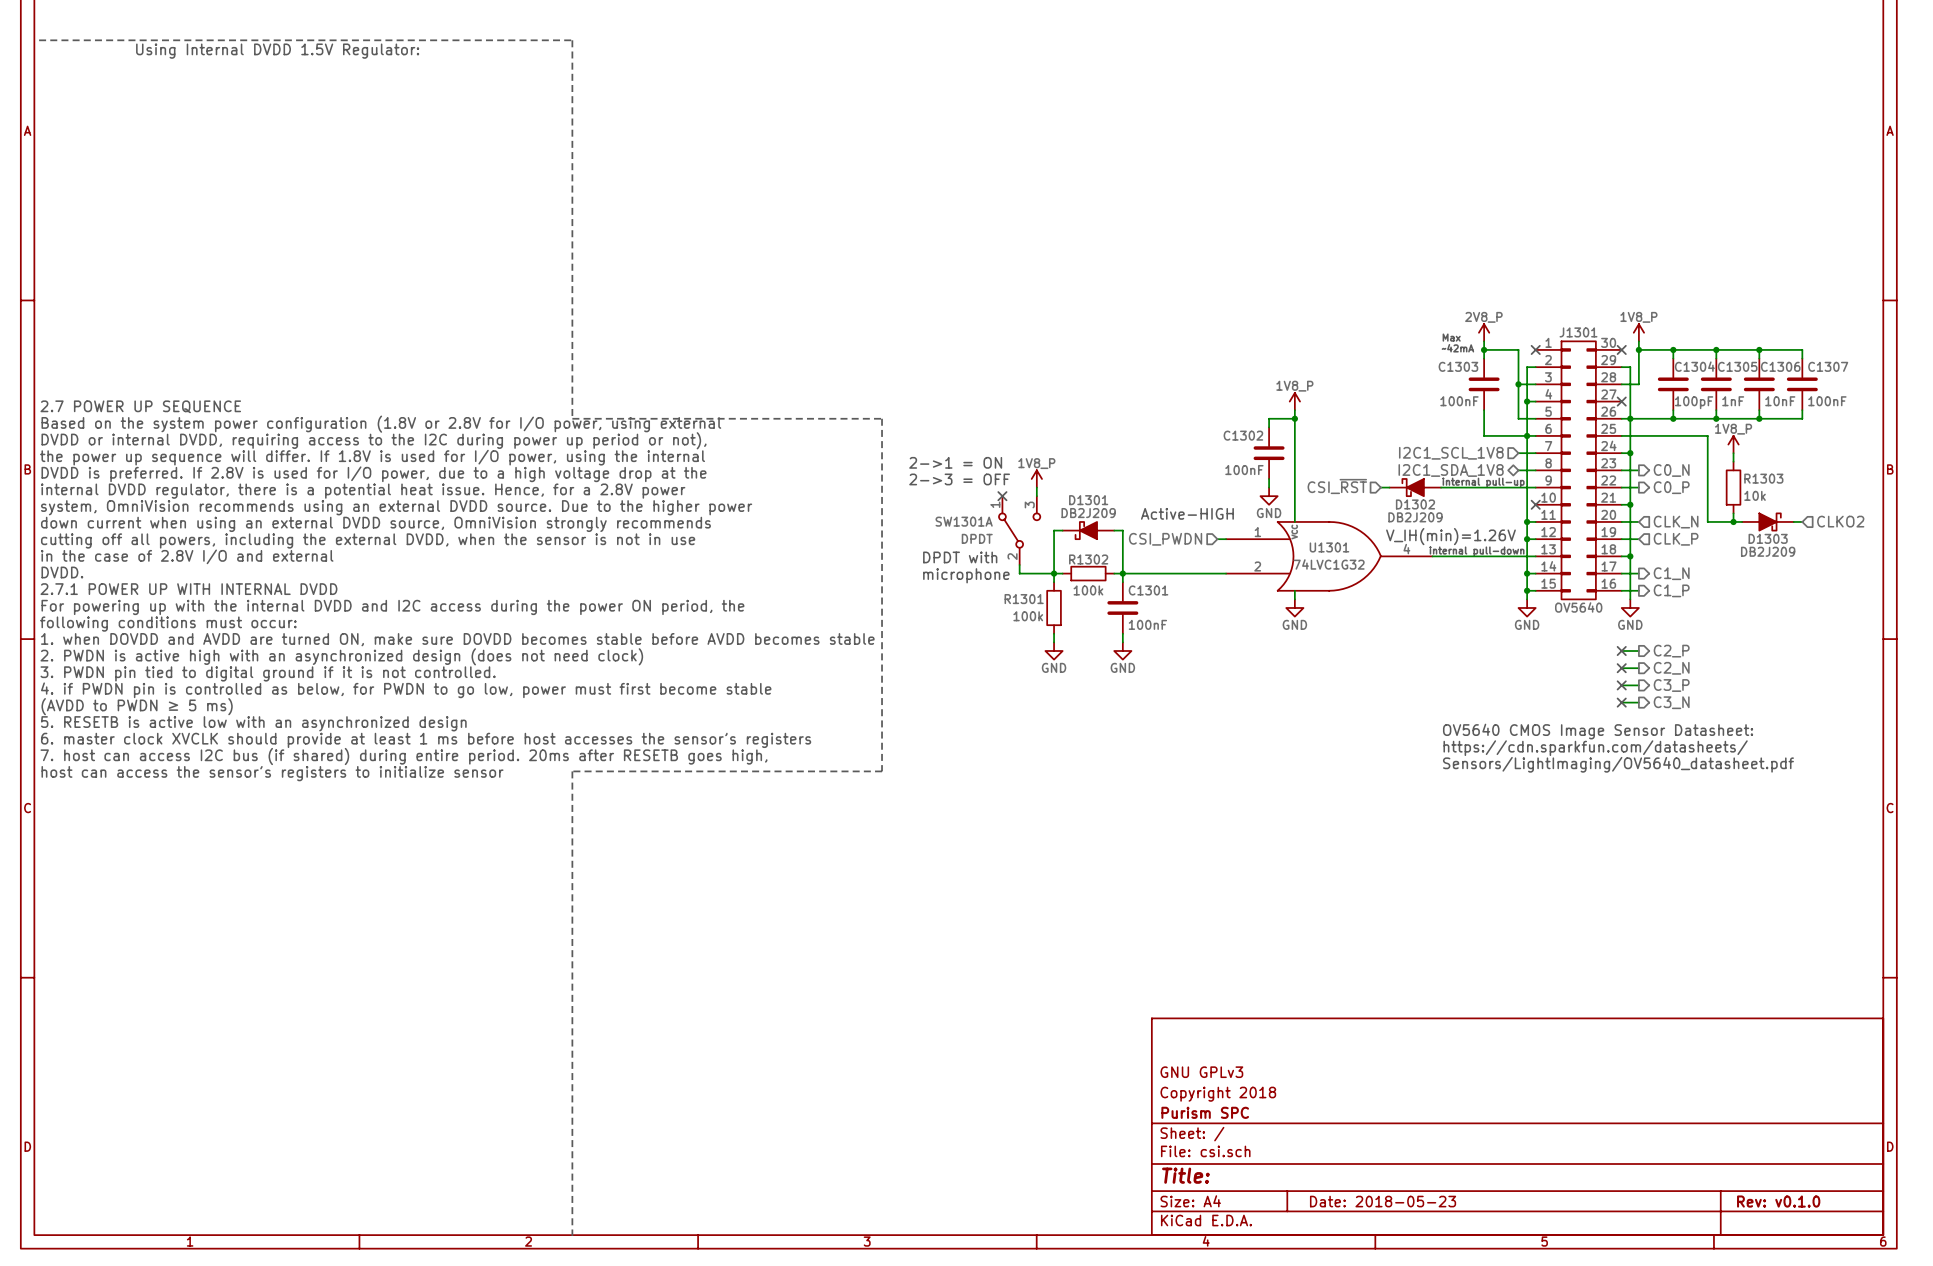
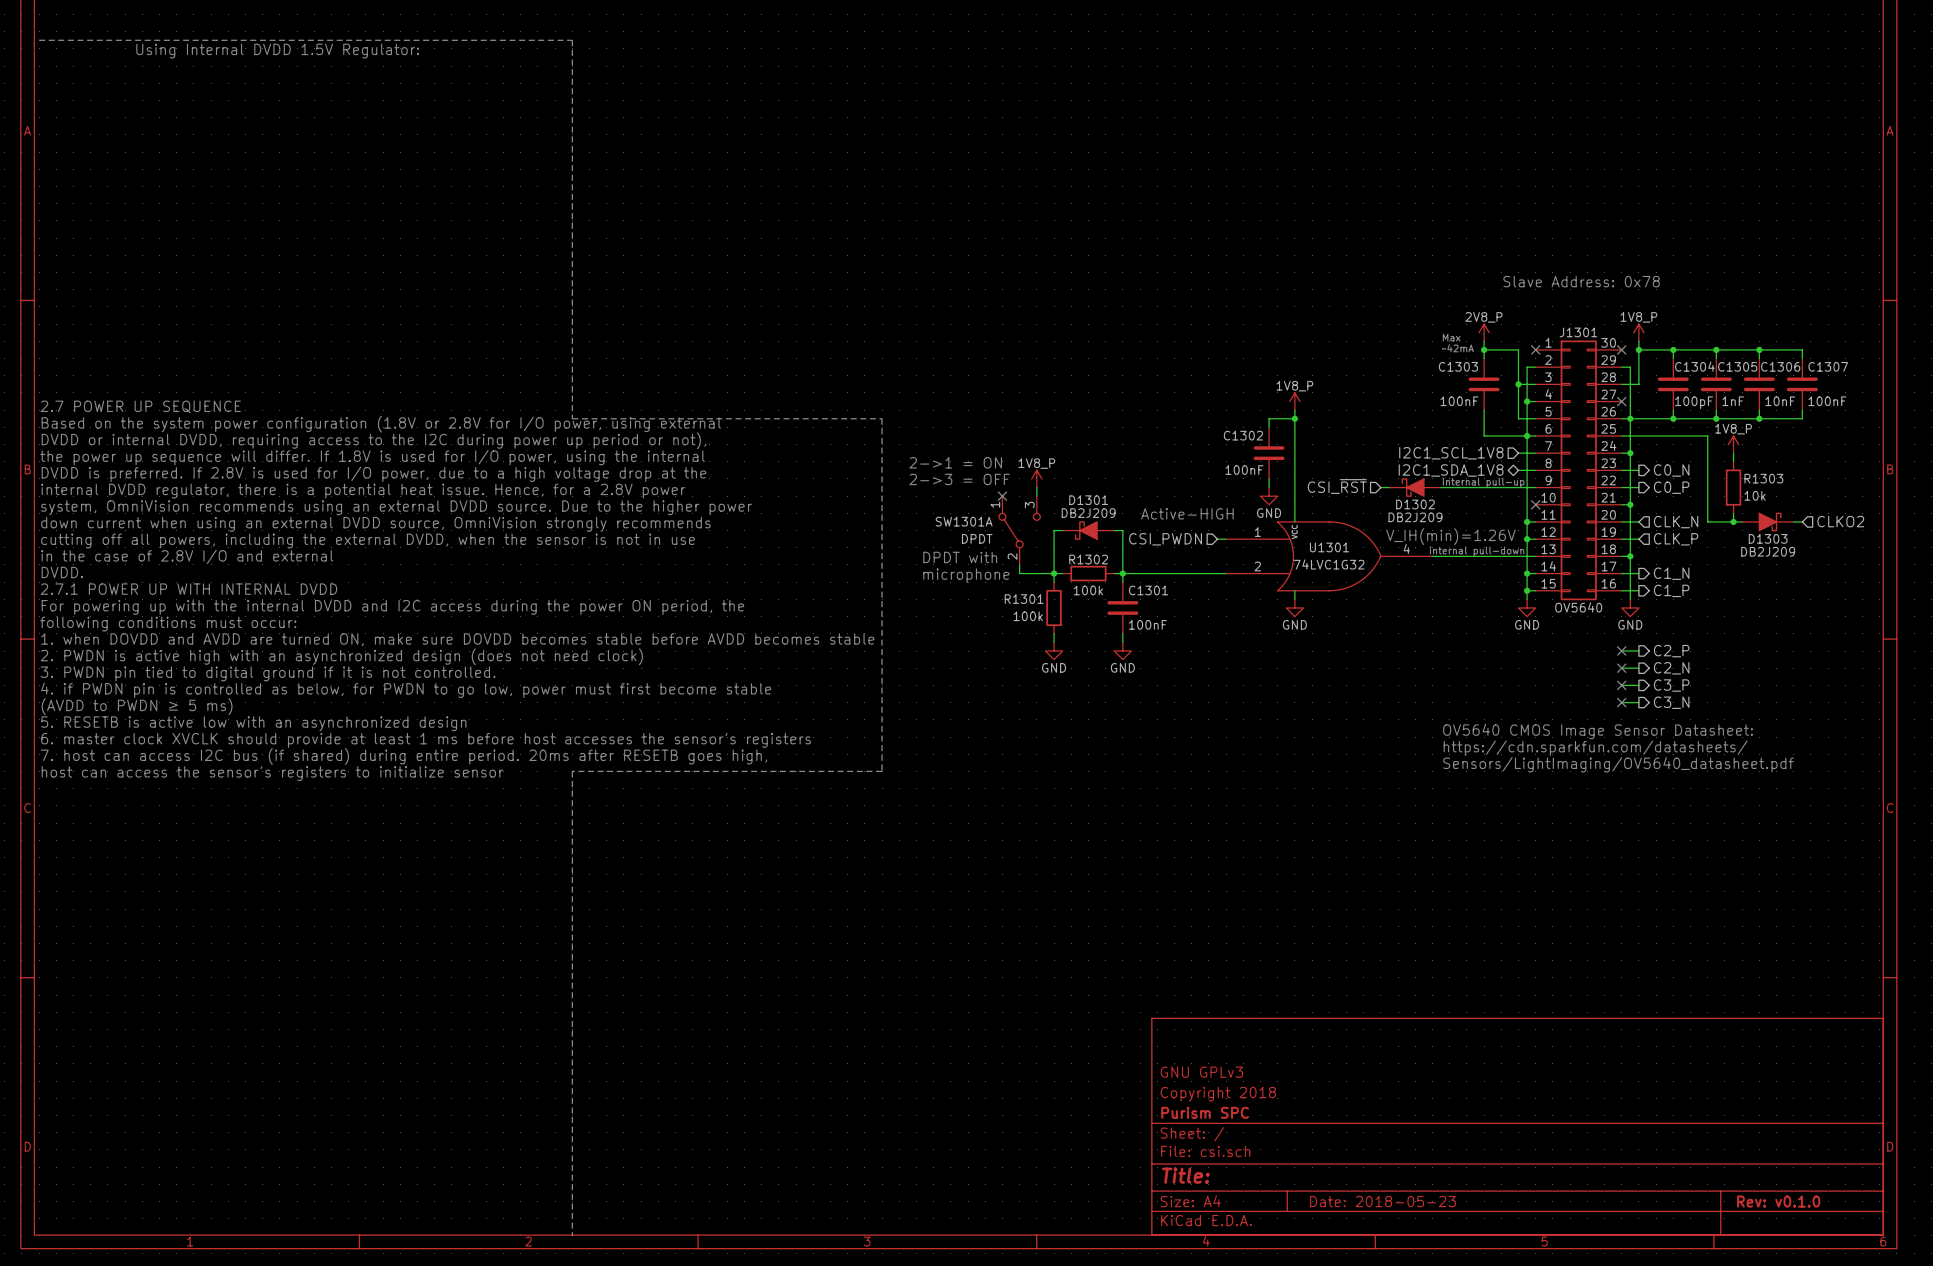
text: none -> Slave Address: 0x78 (1581, 281)

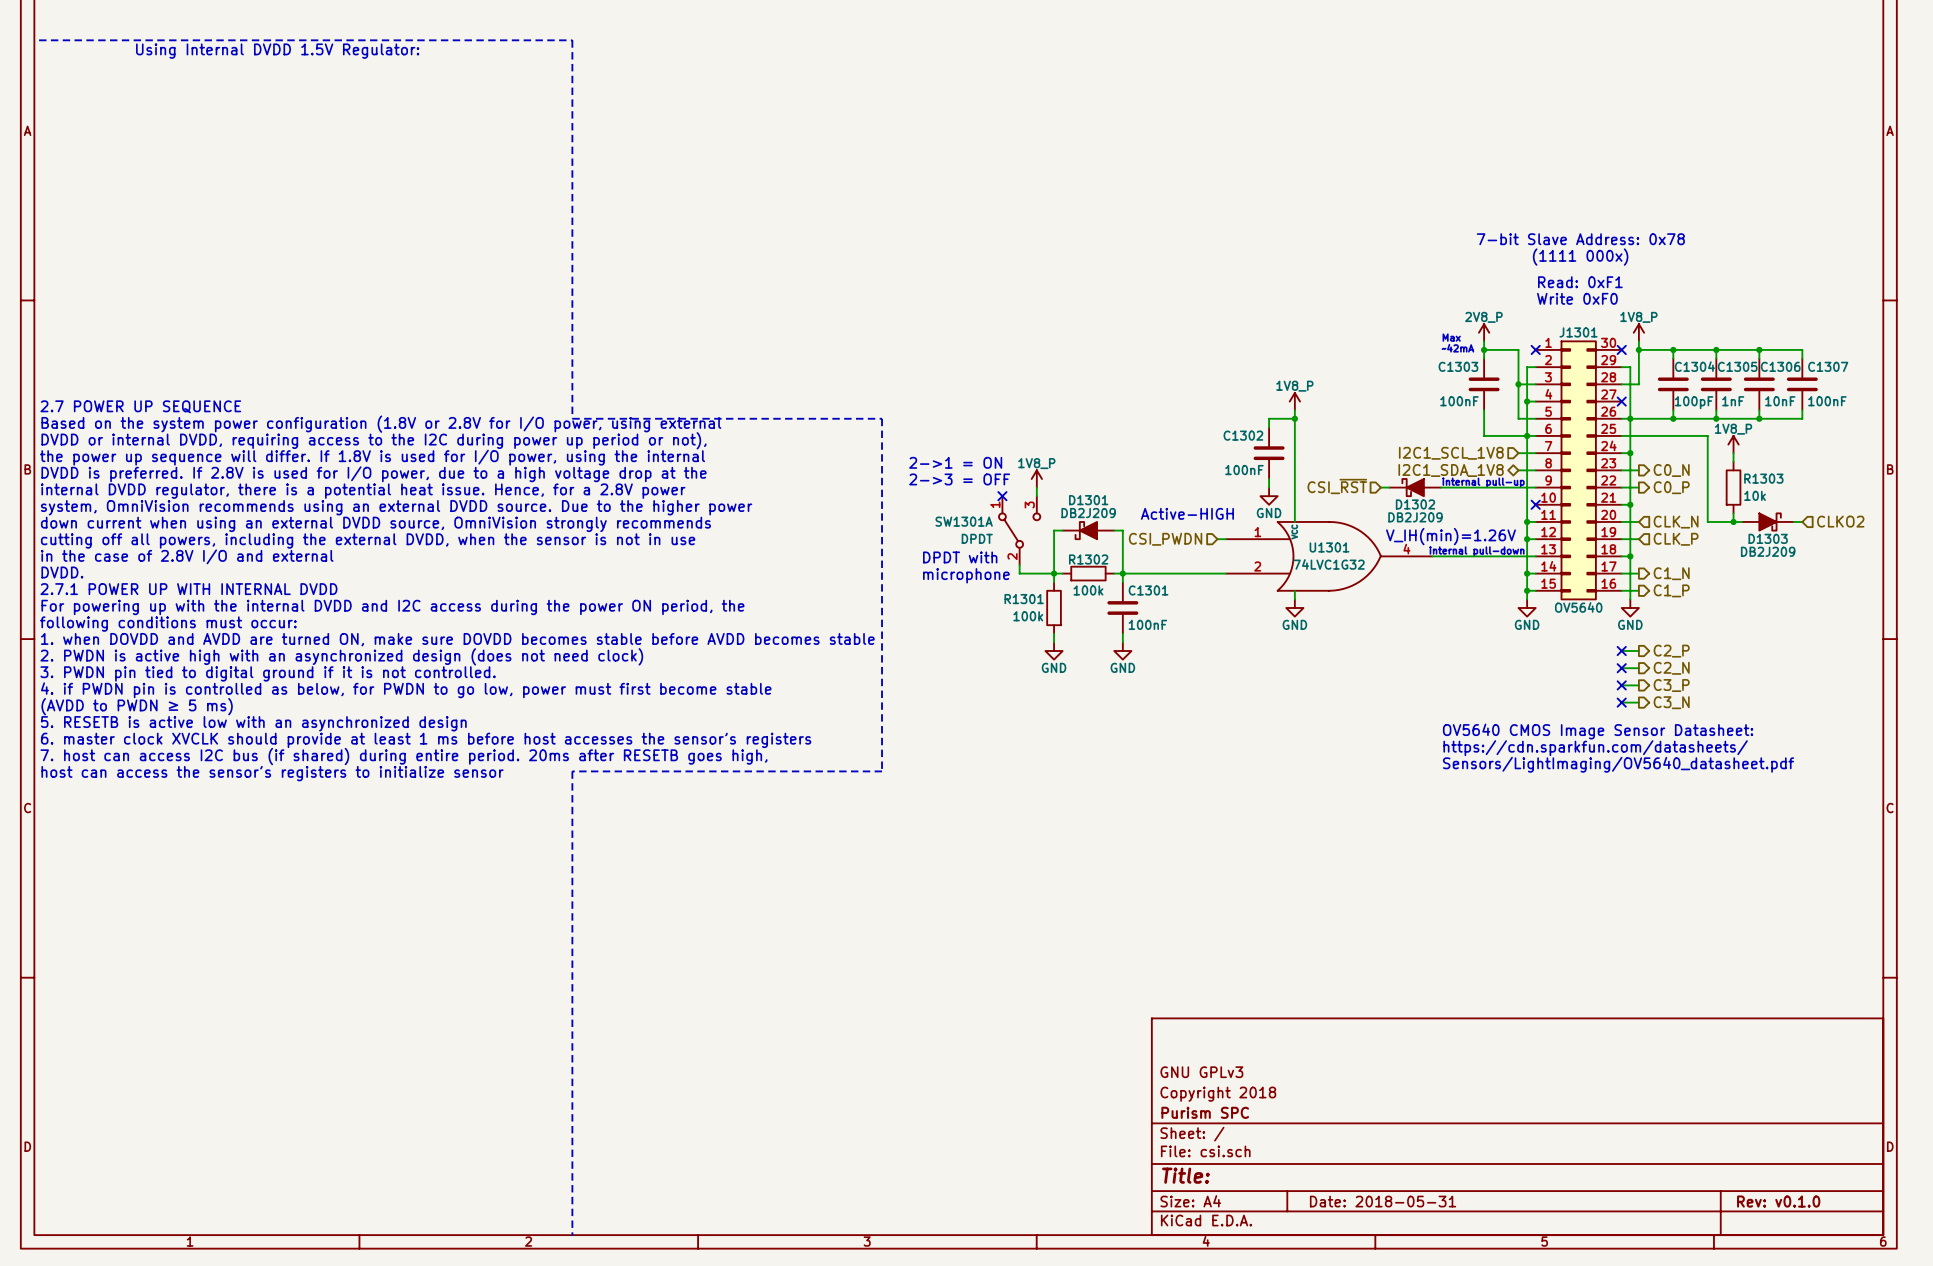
text: none -> 7-bit Slave Address: 0x78 (1580, 239)
text: none -> (1111 000x) (1580, 257)
text: Slave Address: 0x78 (1581, 281) -> none
text: none -> Read: 0xF1 (1580, 282)
text: none -> Write 0xF0 (1577, 298)
title block: Date: 2018-05-23 (1383, 1201) -> Date: 2018-05-31 (1383, 1201)

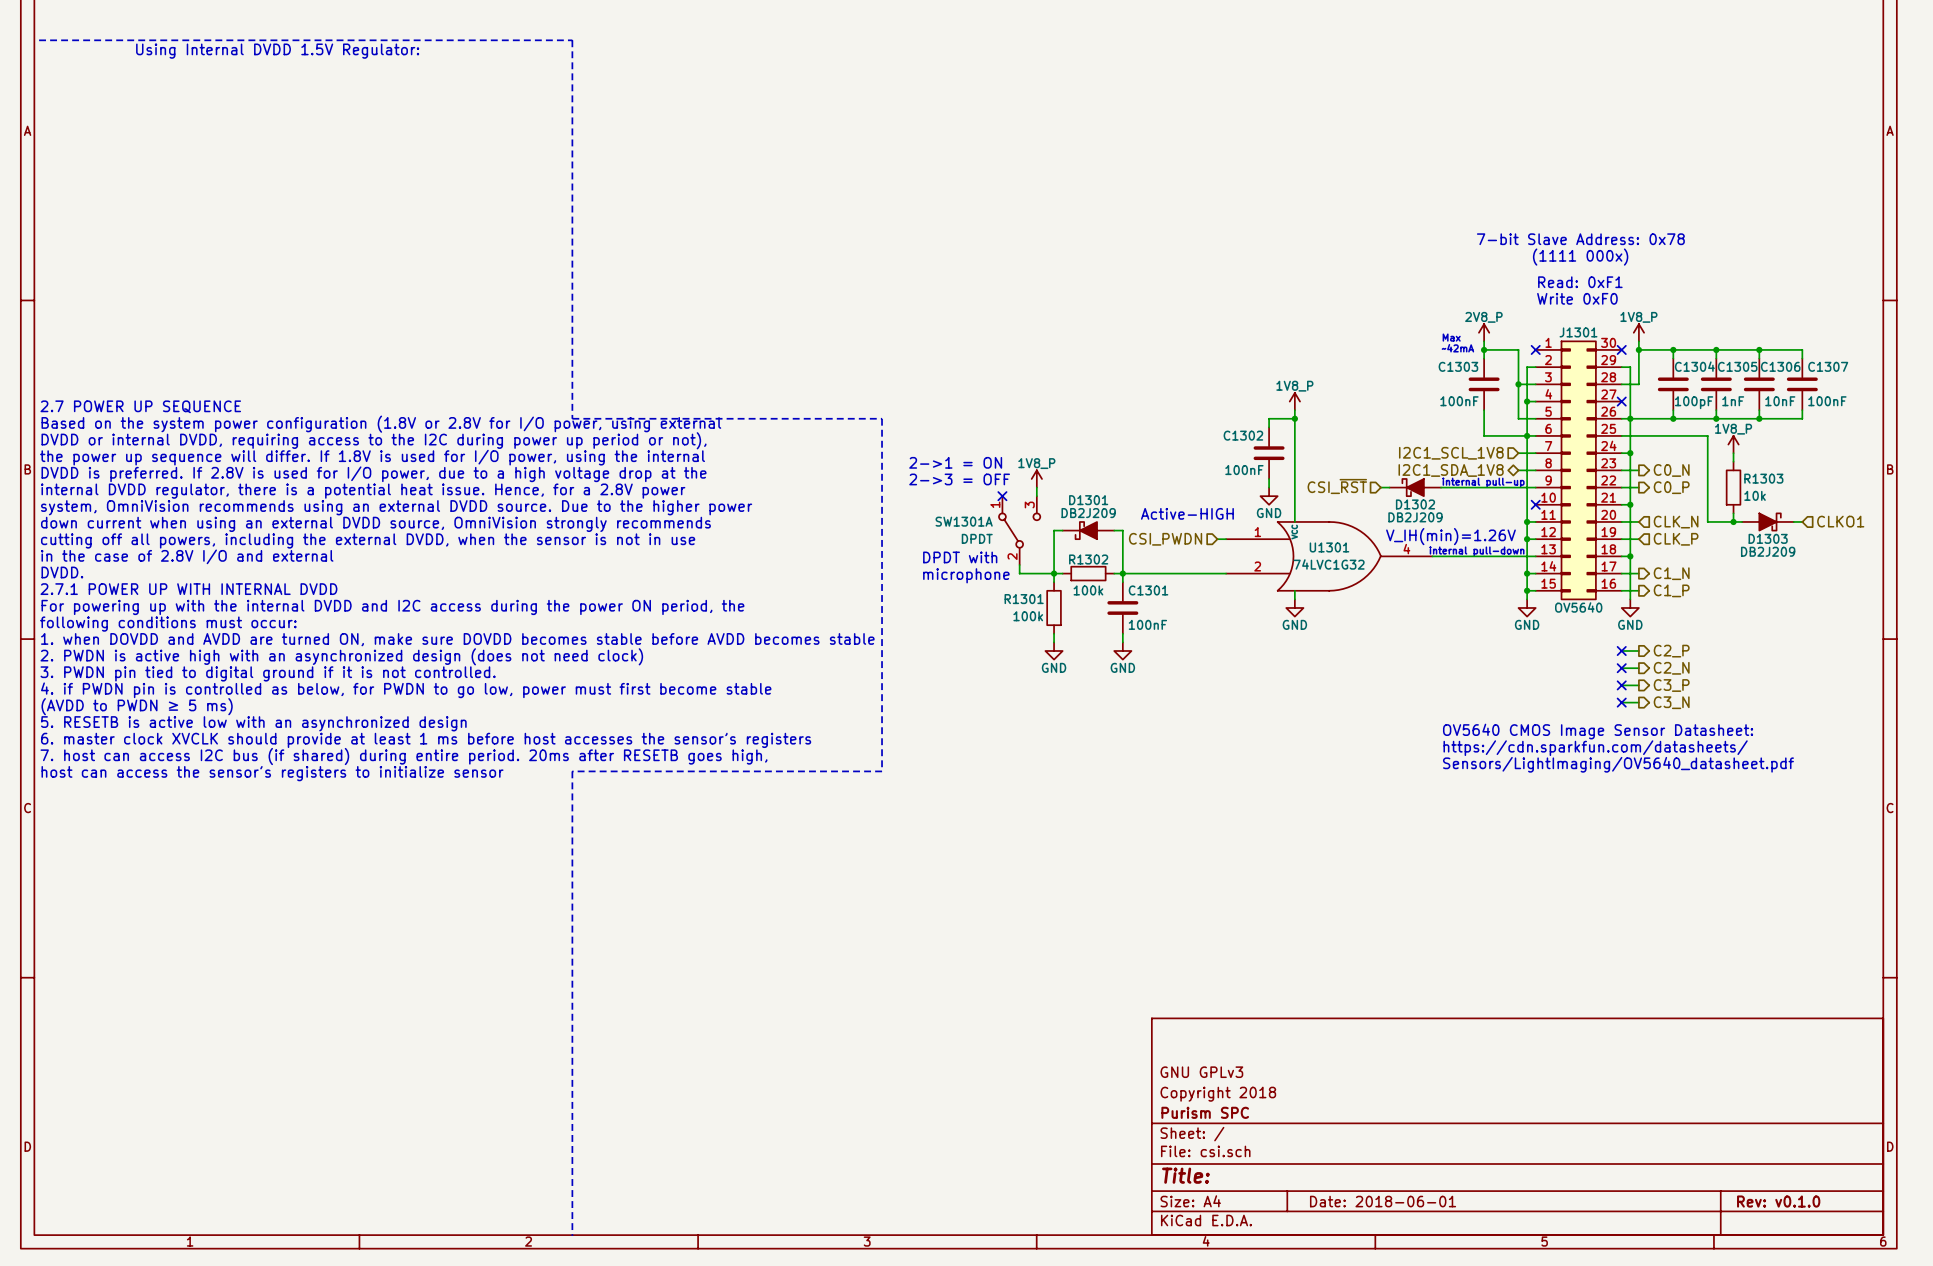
hierarchical label: CLKO2 (1840, 521) -> CLKO1 (1840, 521)
title block: Date: 2018-05-31 (1383, 1201) -> Date: 2018-06-01 (1383, 1201)

